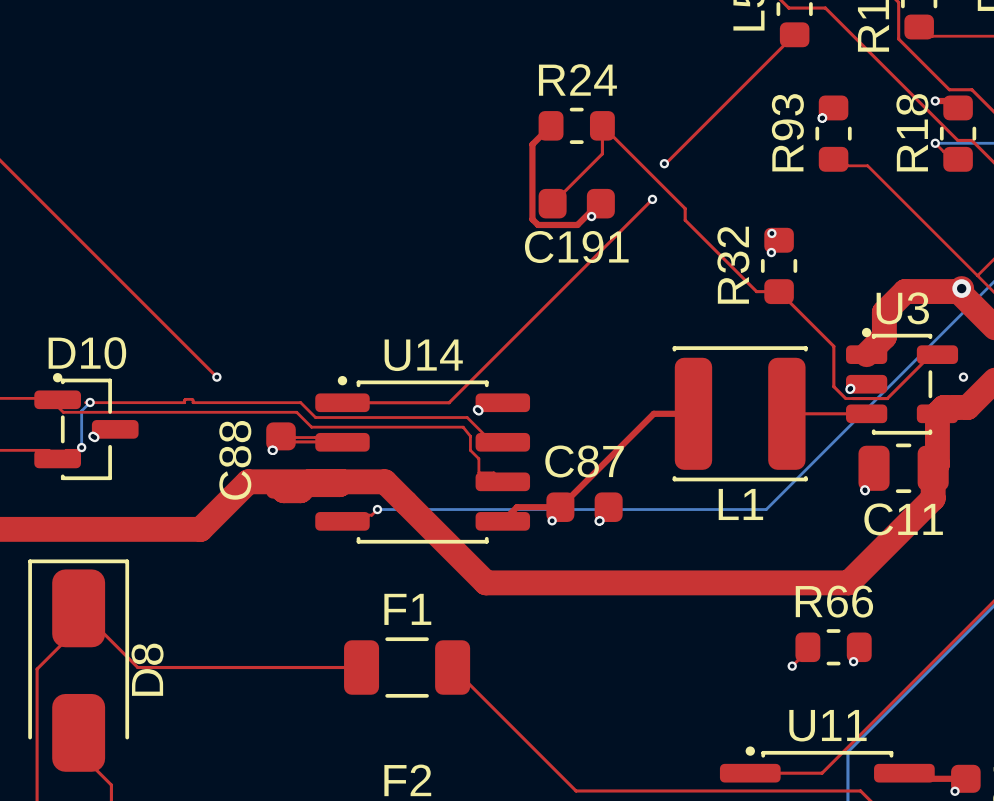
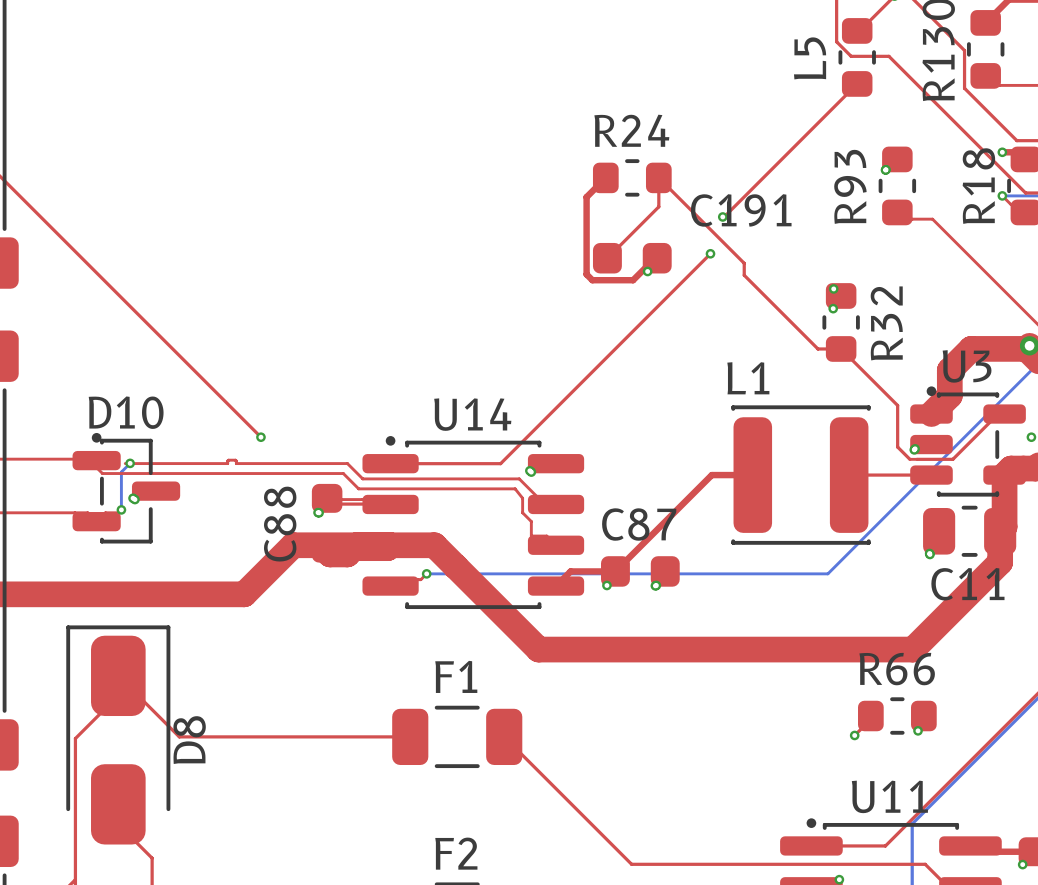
C191 name position: C191 (576, 247) -> C191 (741, 210)
R32 name position: R32 (733, 265) -> R32 (886, 323)
L1 name position: L1 (740, 504) -> L1 (748, 378)

